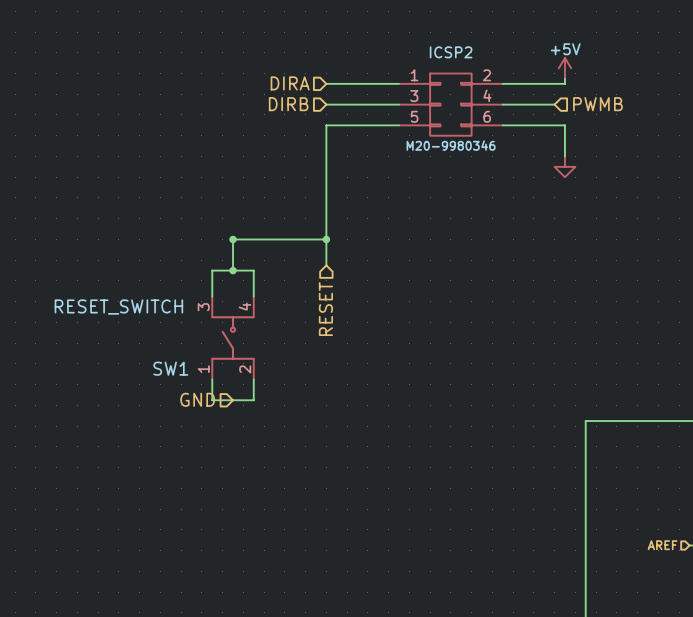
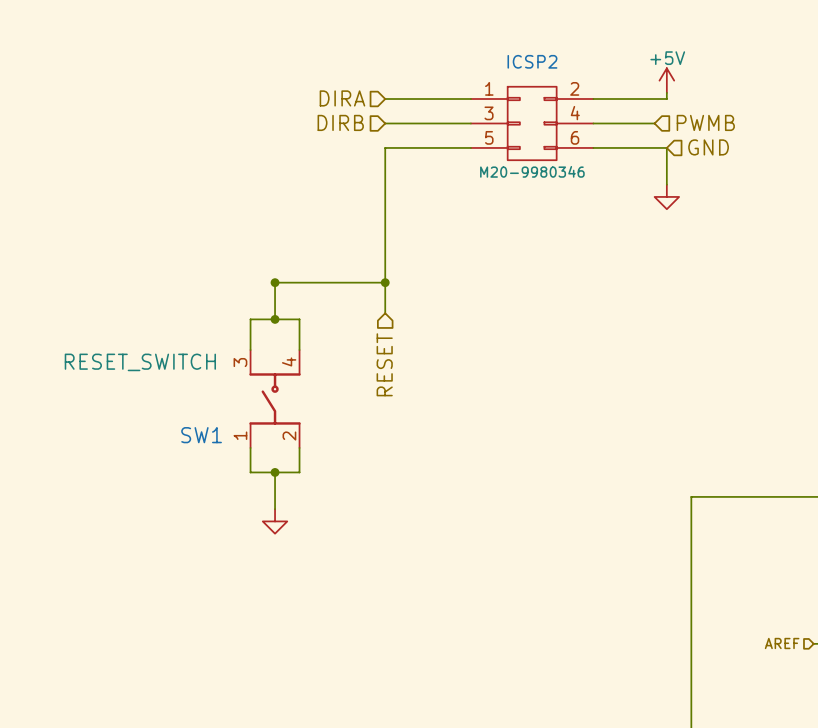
hierarchical label: none -> GND (708, 147)
hierarchical label: GND (197, 399) -> none
wire: none -> (275, 472) (275, 509)
junction: none -> (275, 472)
power symbol: none -> (275, 521)

